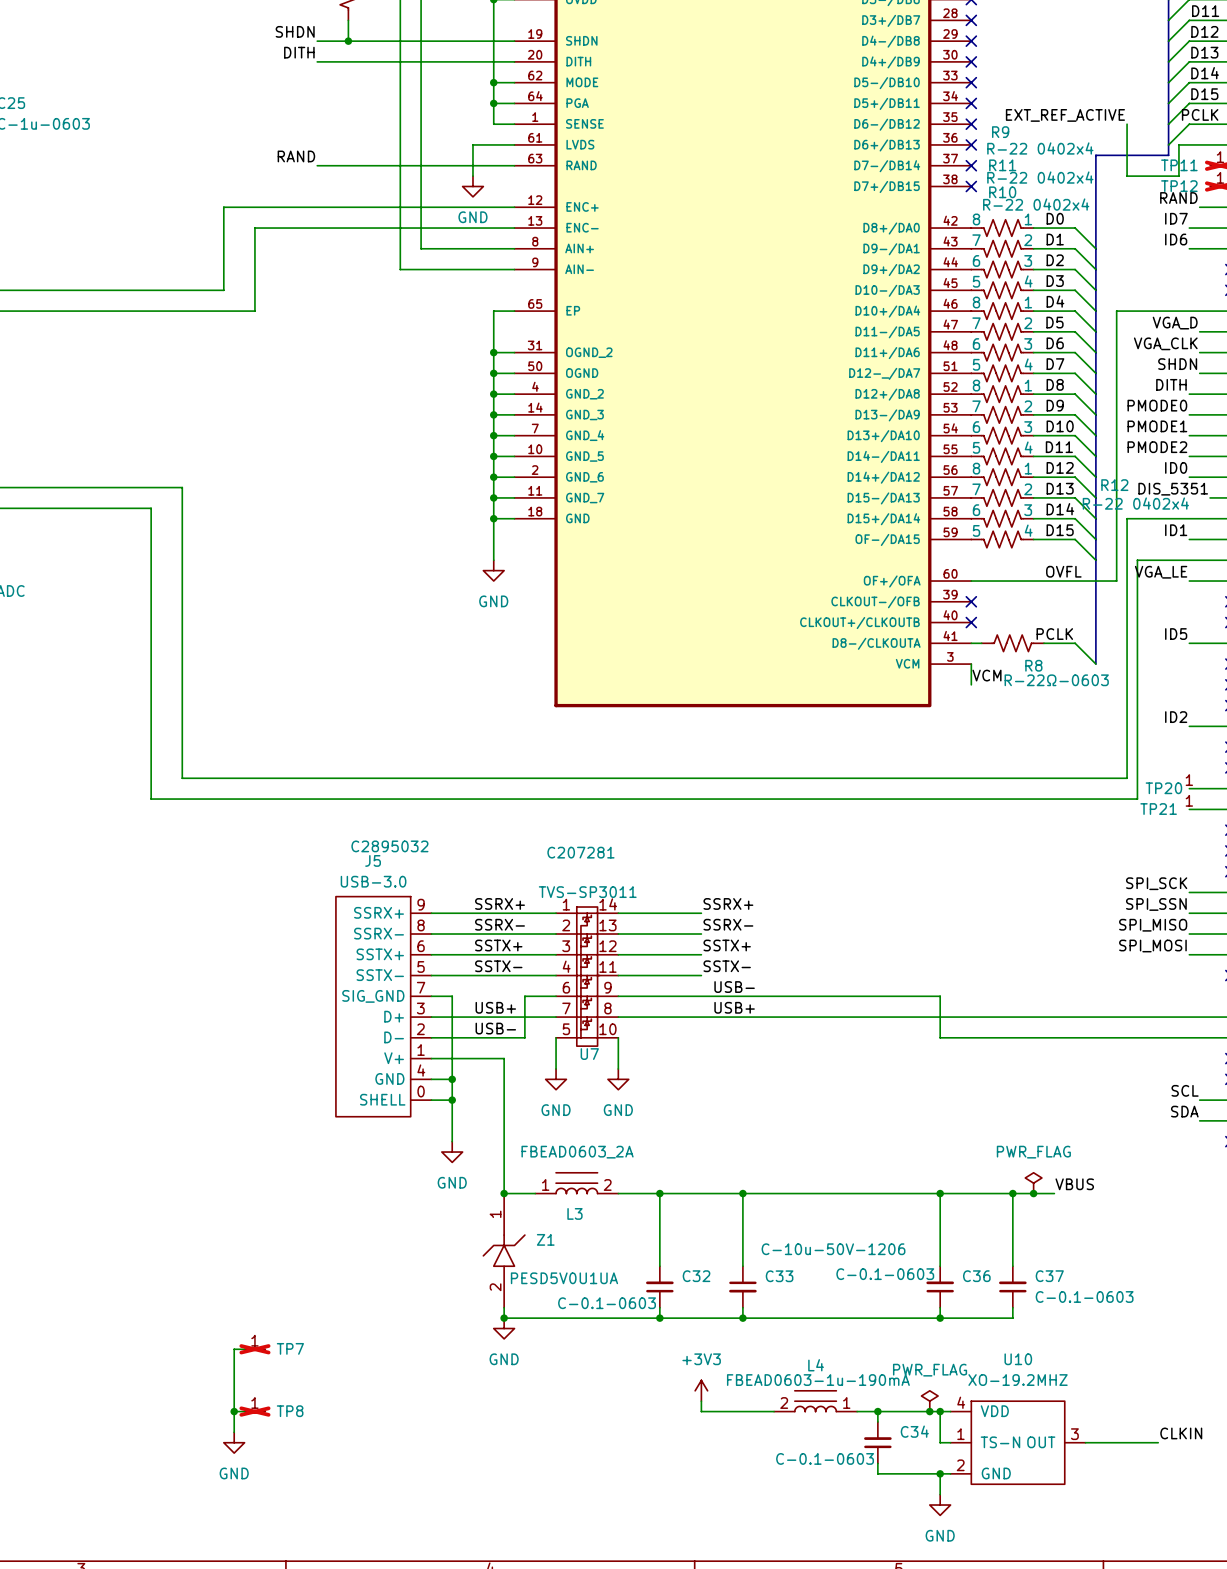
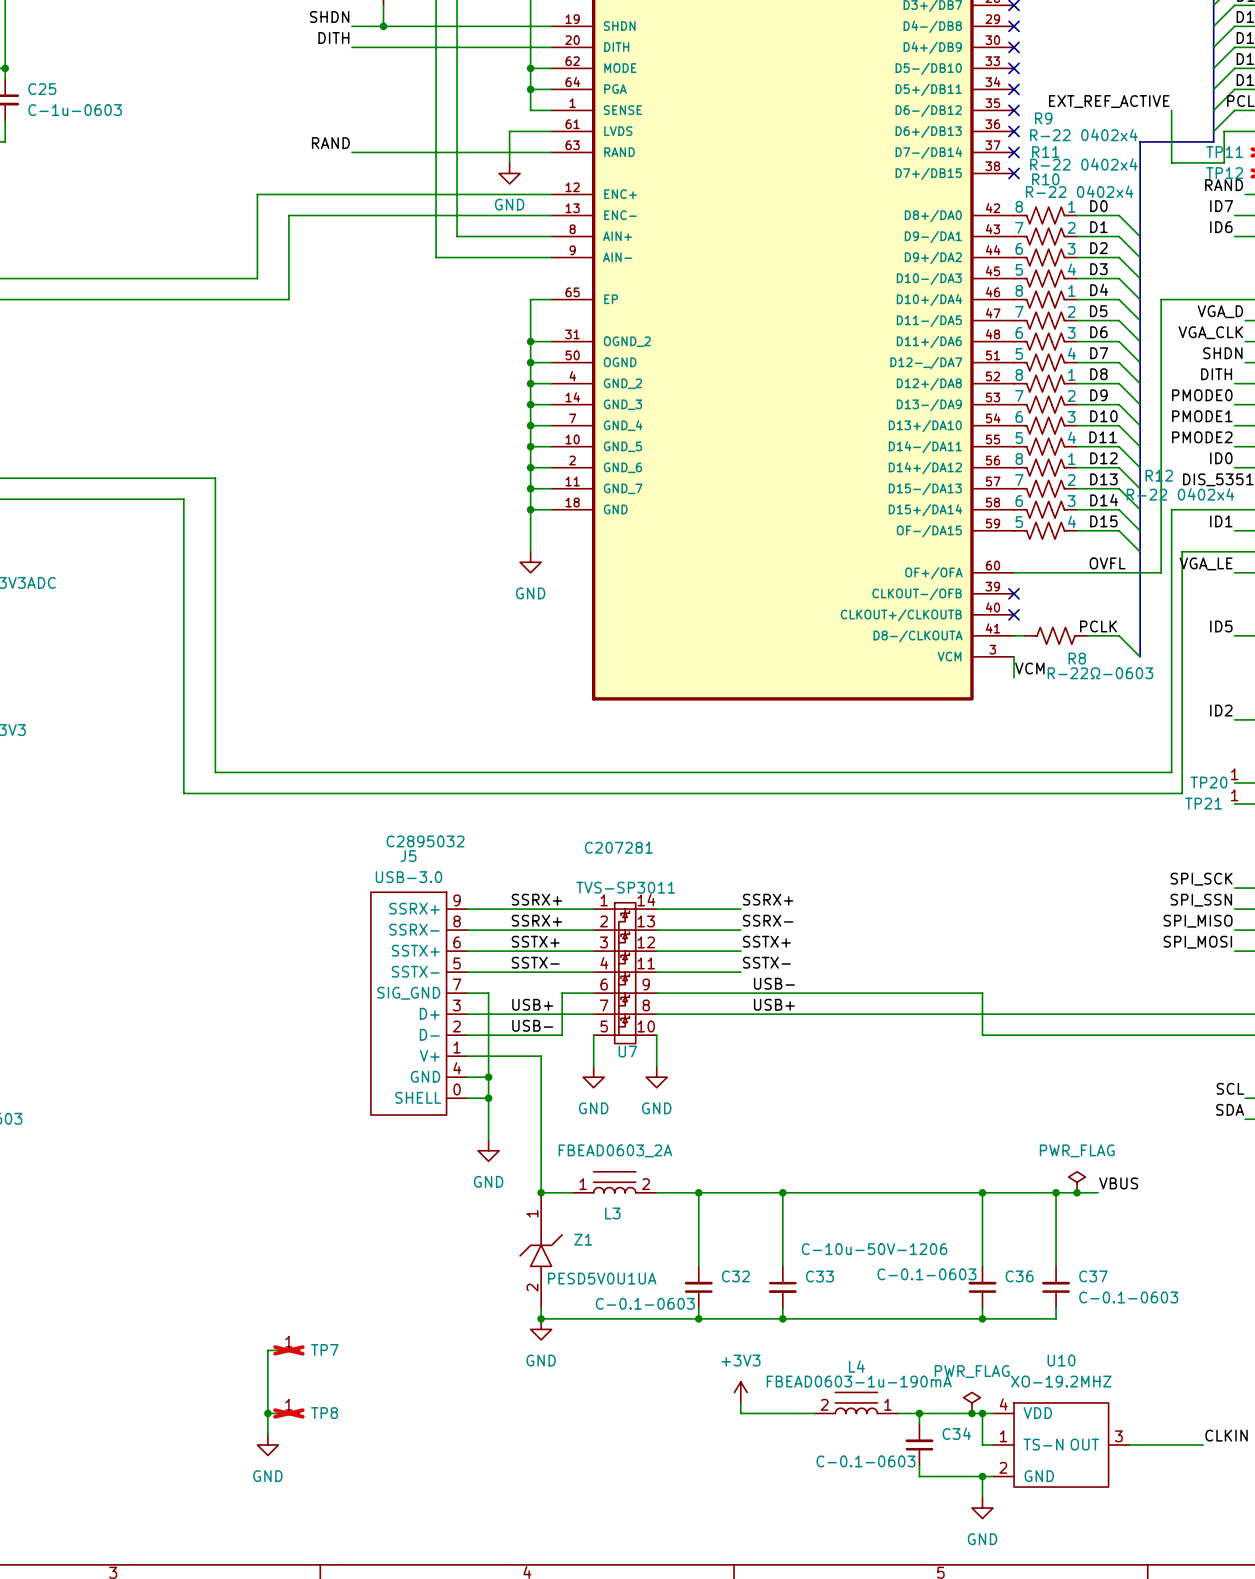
label: SSRX- (500, 924) -> SSRX+ (536, 920)

